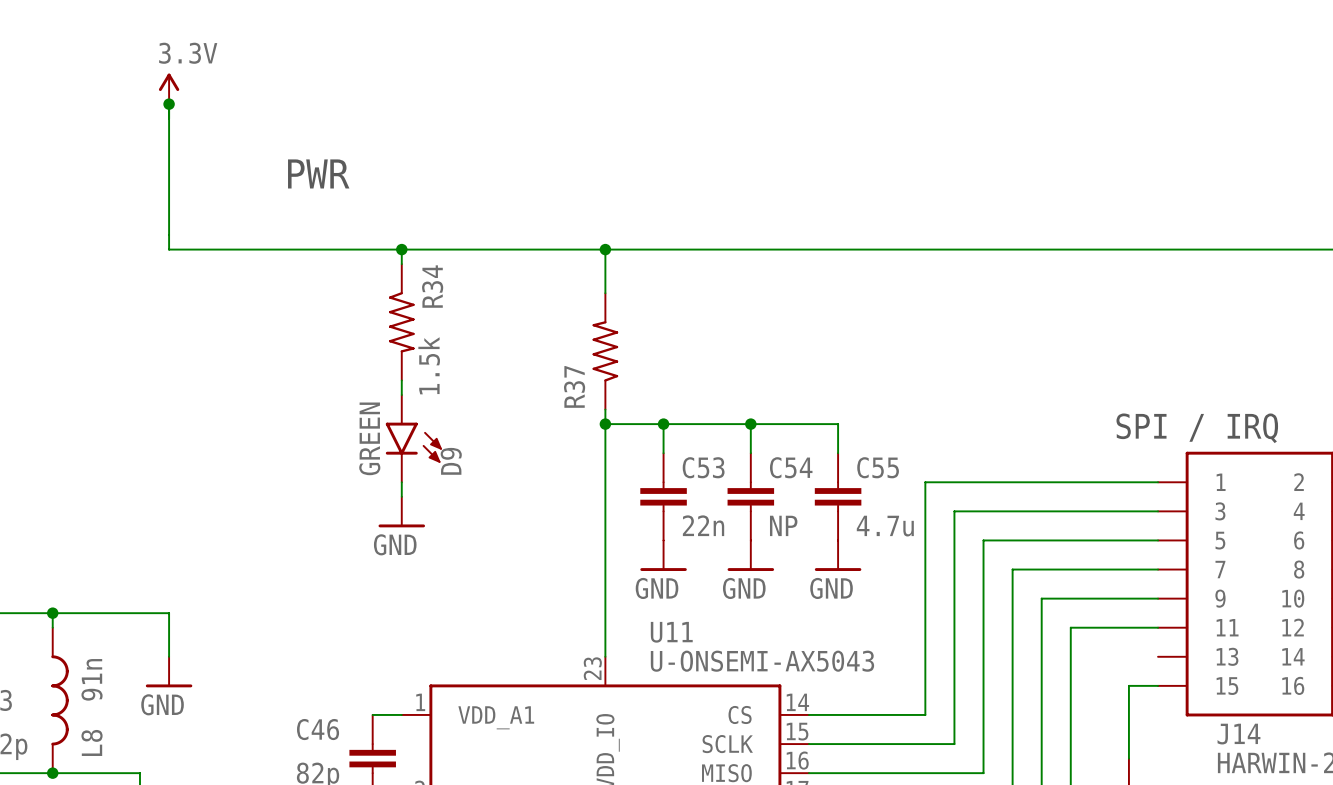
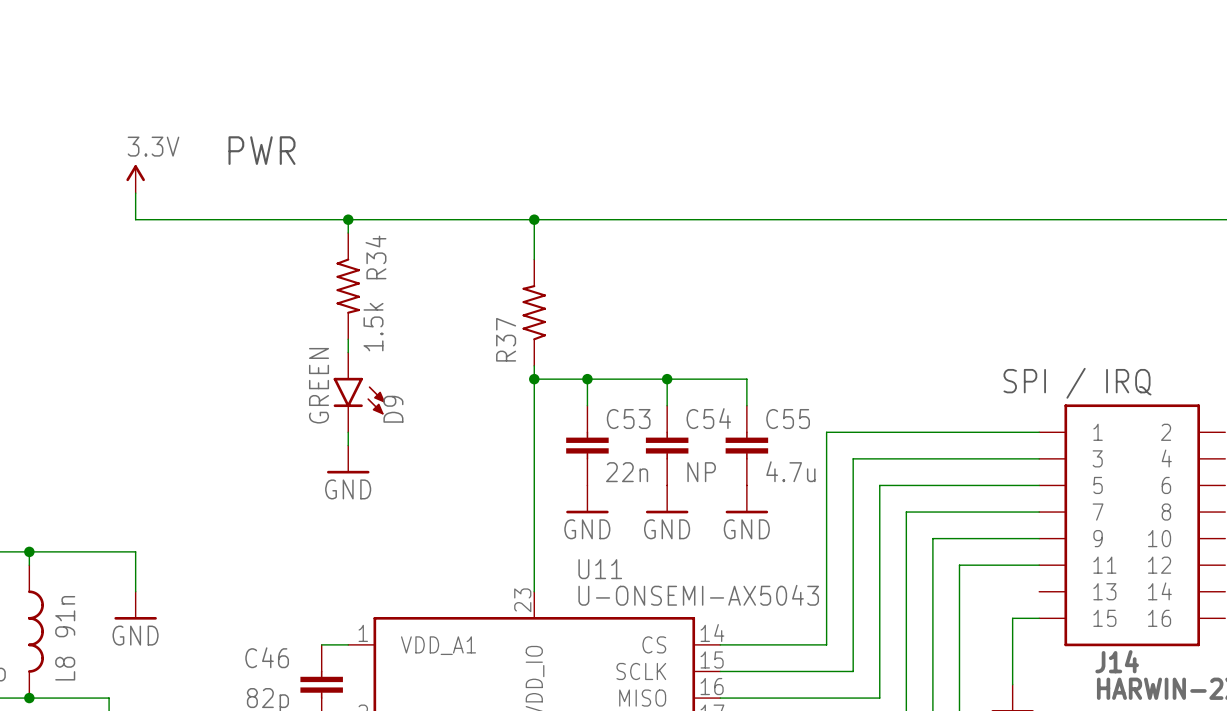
power symbol position: 3.3V (169, 88) -> 3.3V (135, 179)
wire: (169, 104) (169, 220) -> none
junction: (169, 104) -> none

